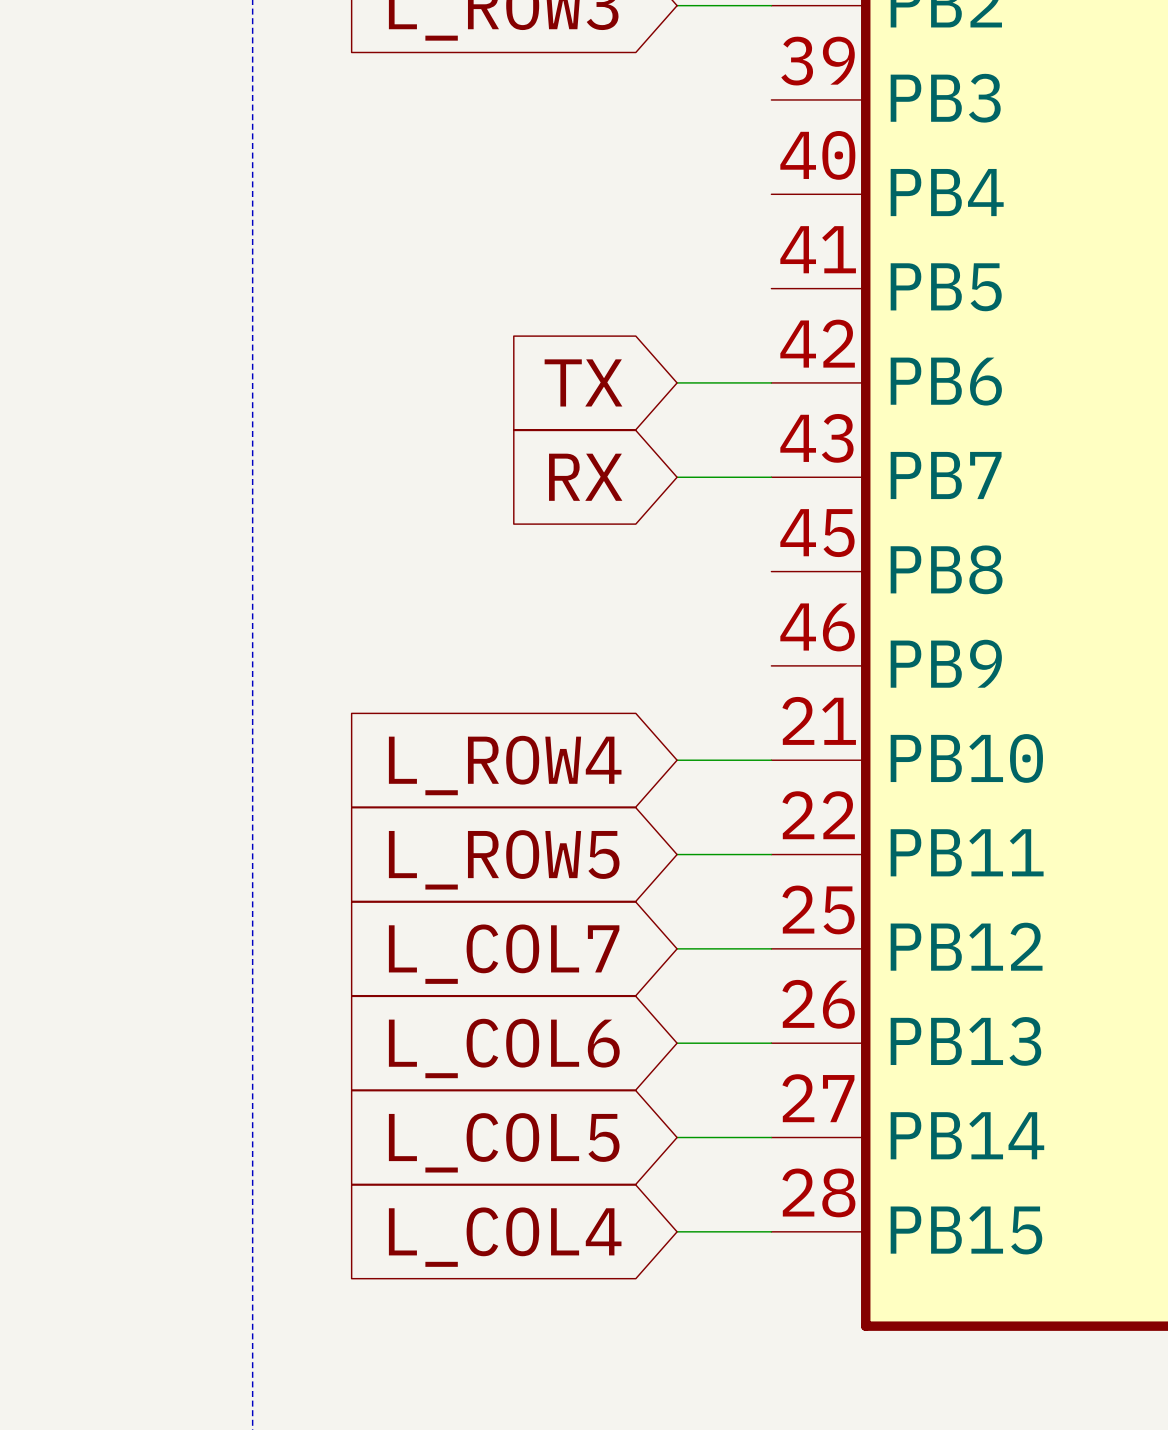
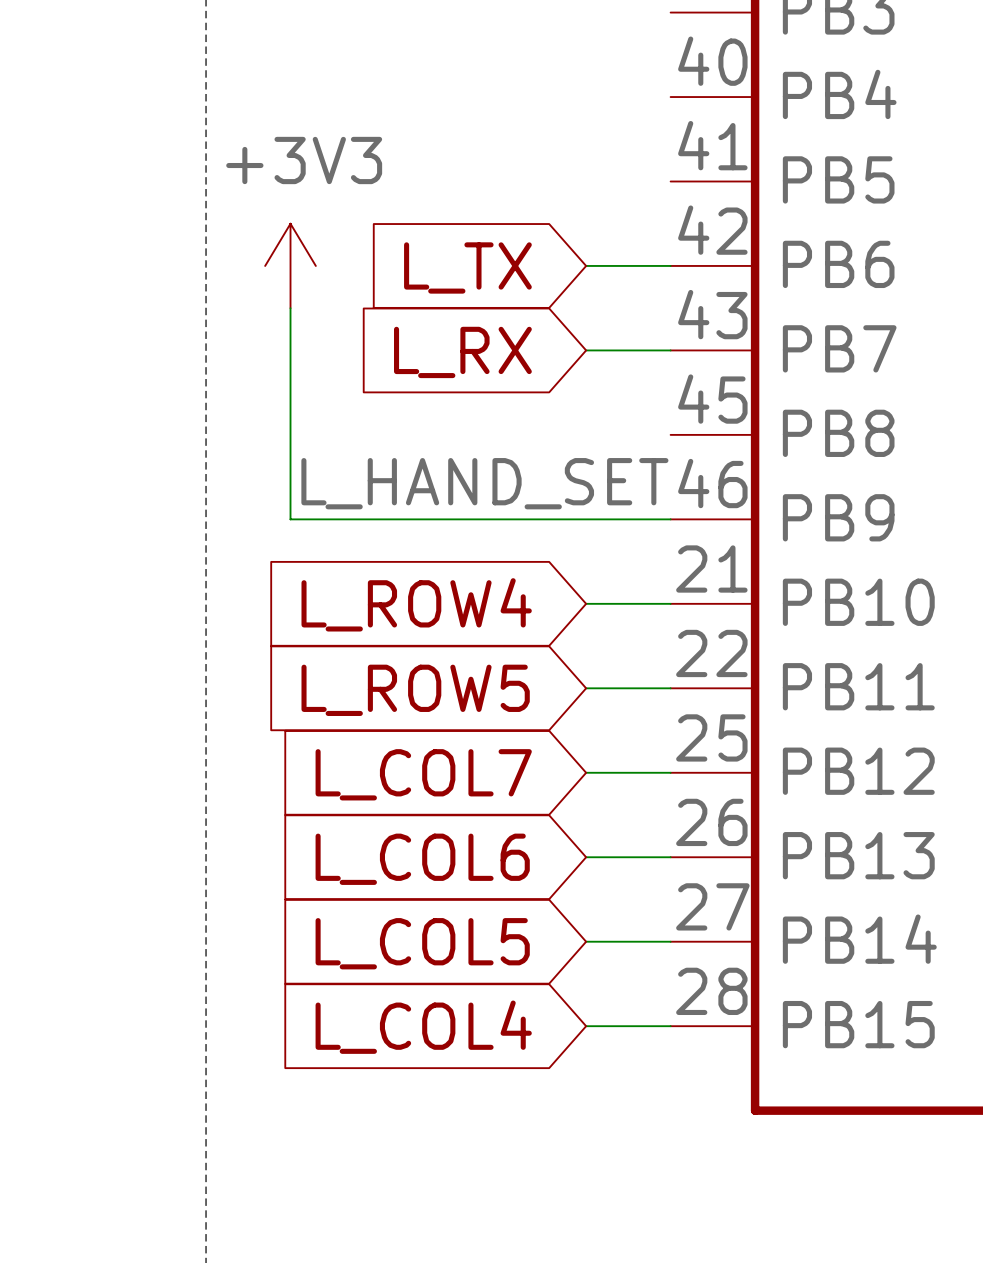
power symbol: none -> +3V3 (290, 265)
global label: TX (583, 382) -> L_TX (467, 267)
wire: none -> (290, 308) (290, 519) (670, 519)
global label: RX (585, 477) -> L_RX (462, 352)
label: none -> L_HAND_SET (484, 483)

